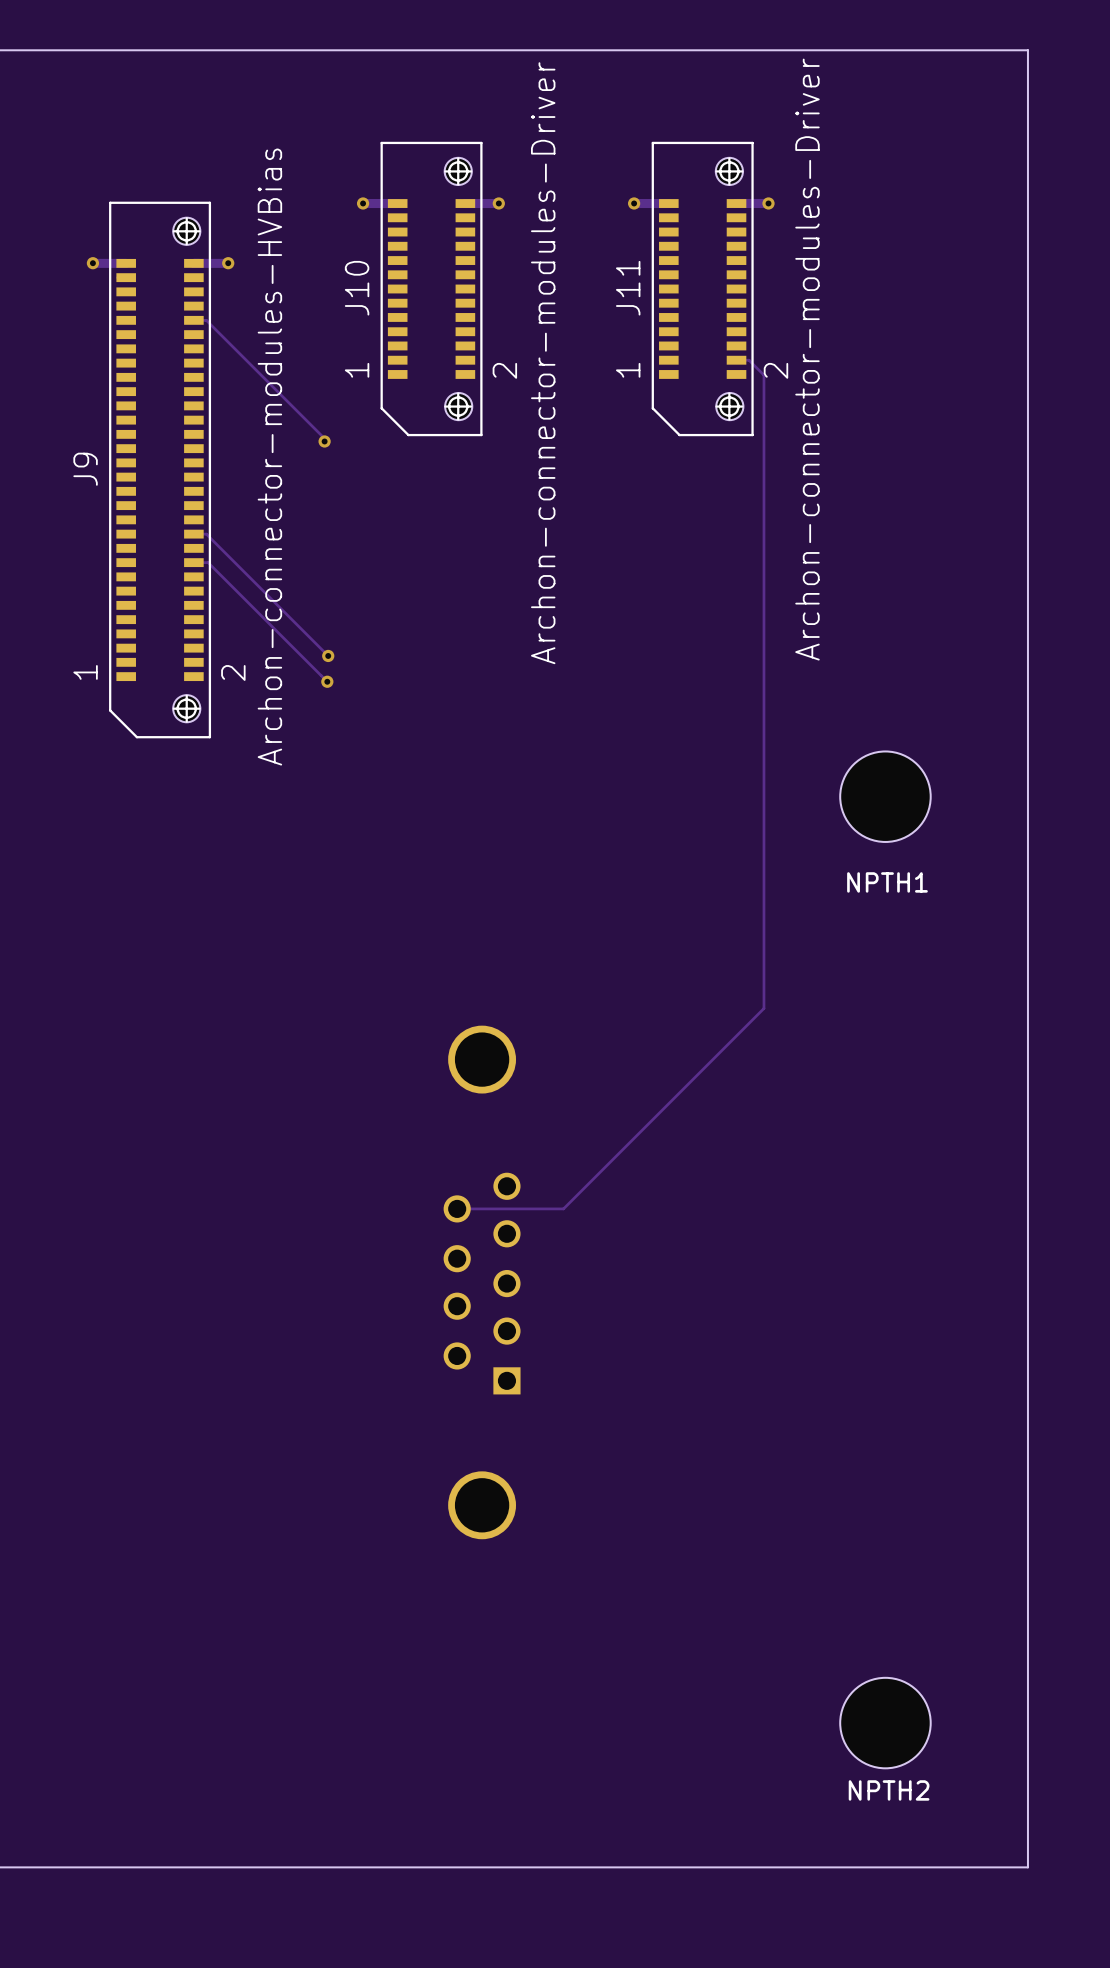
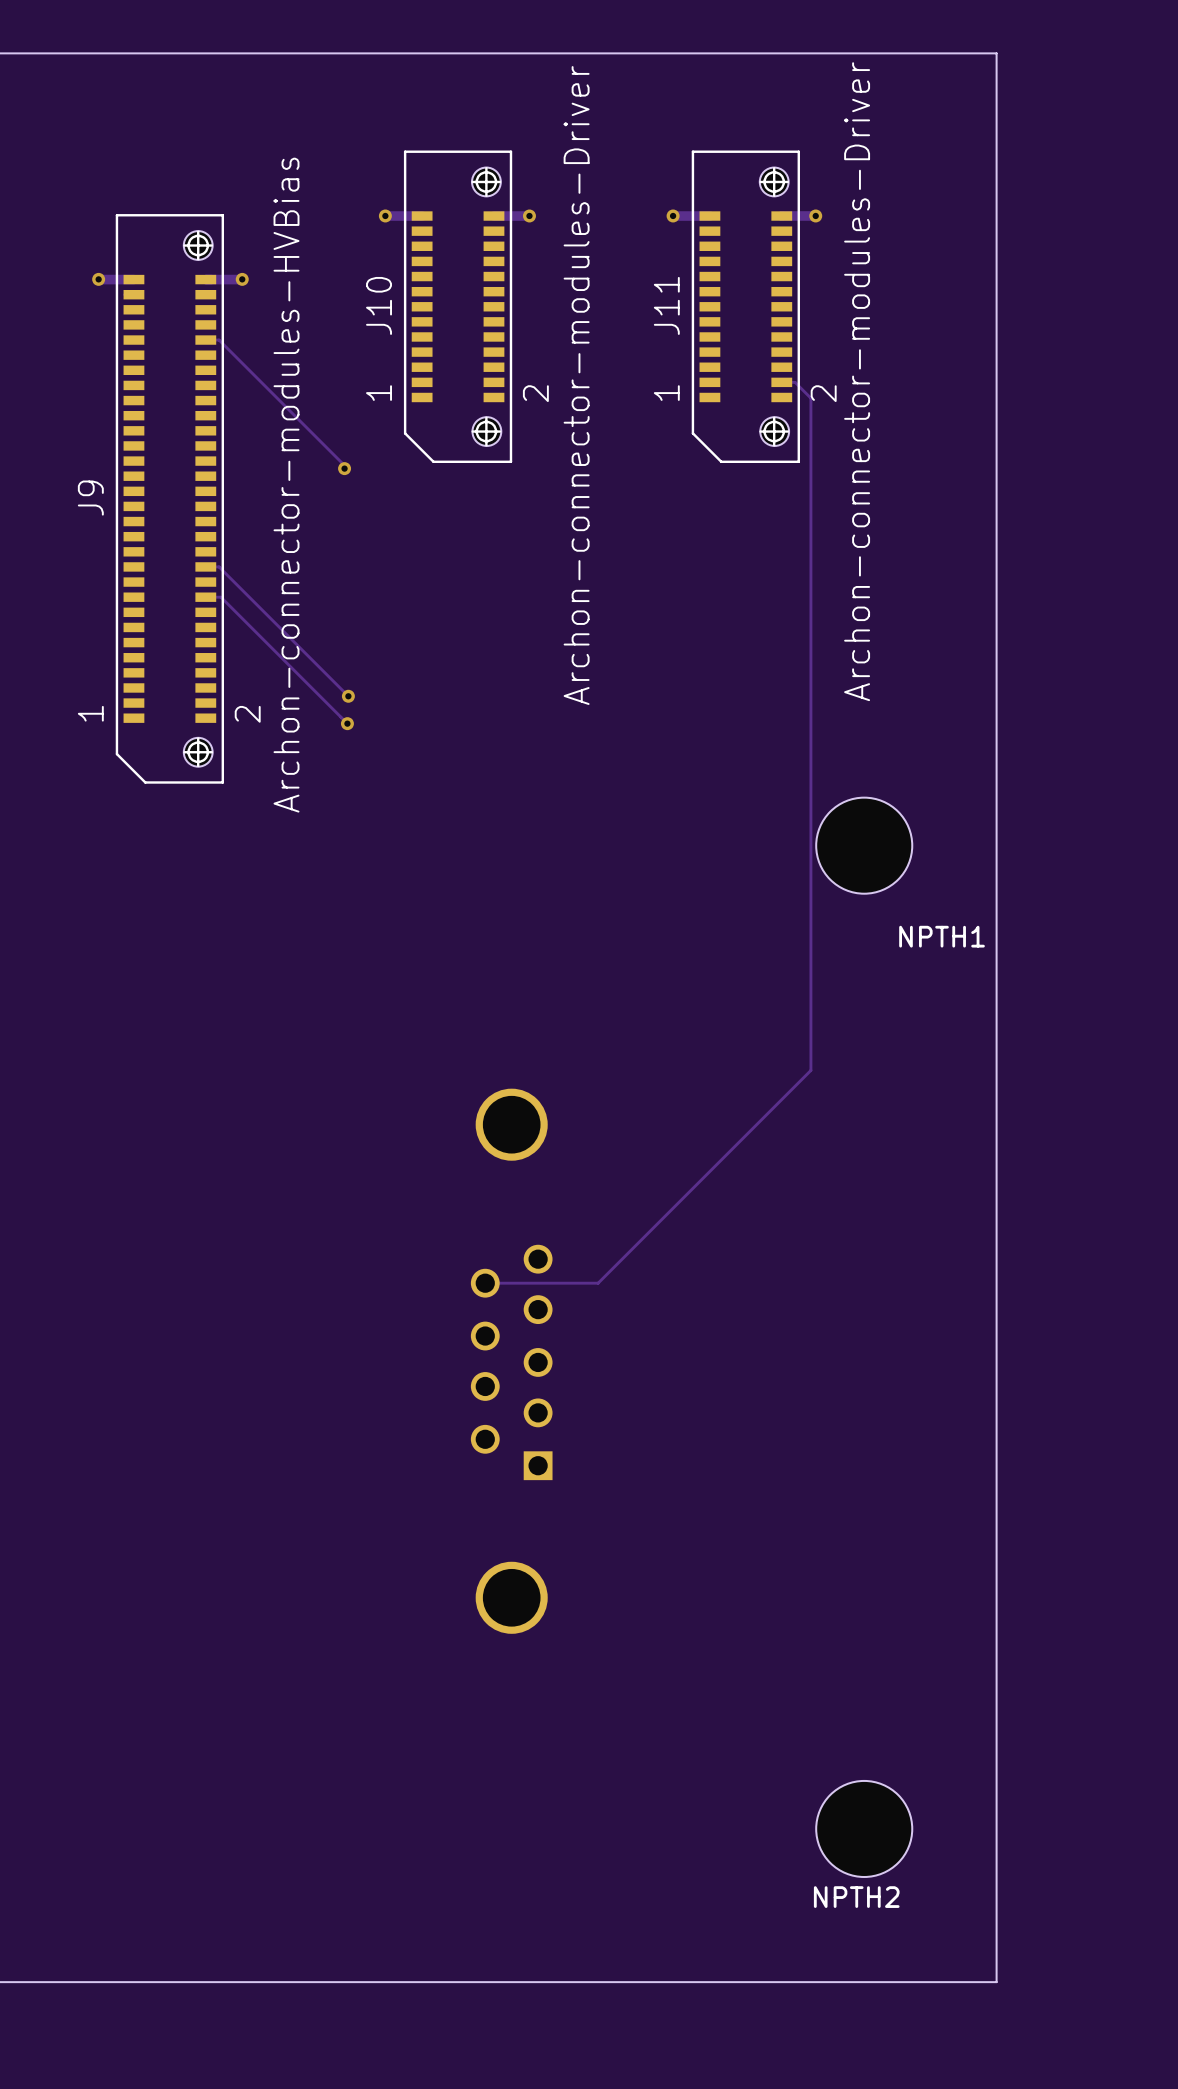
board edge: (938, 50) (1027, 50) (1027, 1867) (938, 1867) -> (996, 53) (996, 1982)
NPTH1 position: (885, 796) -> (864, 845)
NPTH2 position: (885, 1723) -> (864, 1828)
NPTH2 name position: NPTH2 (889, 1790) -> NPTH2 (856, 1897)

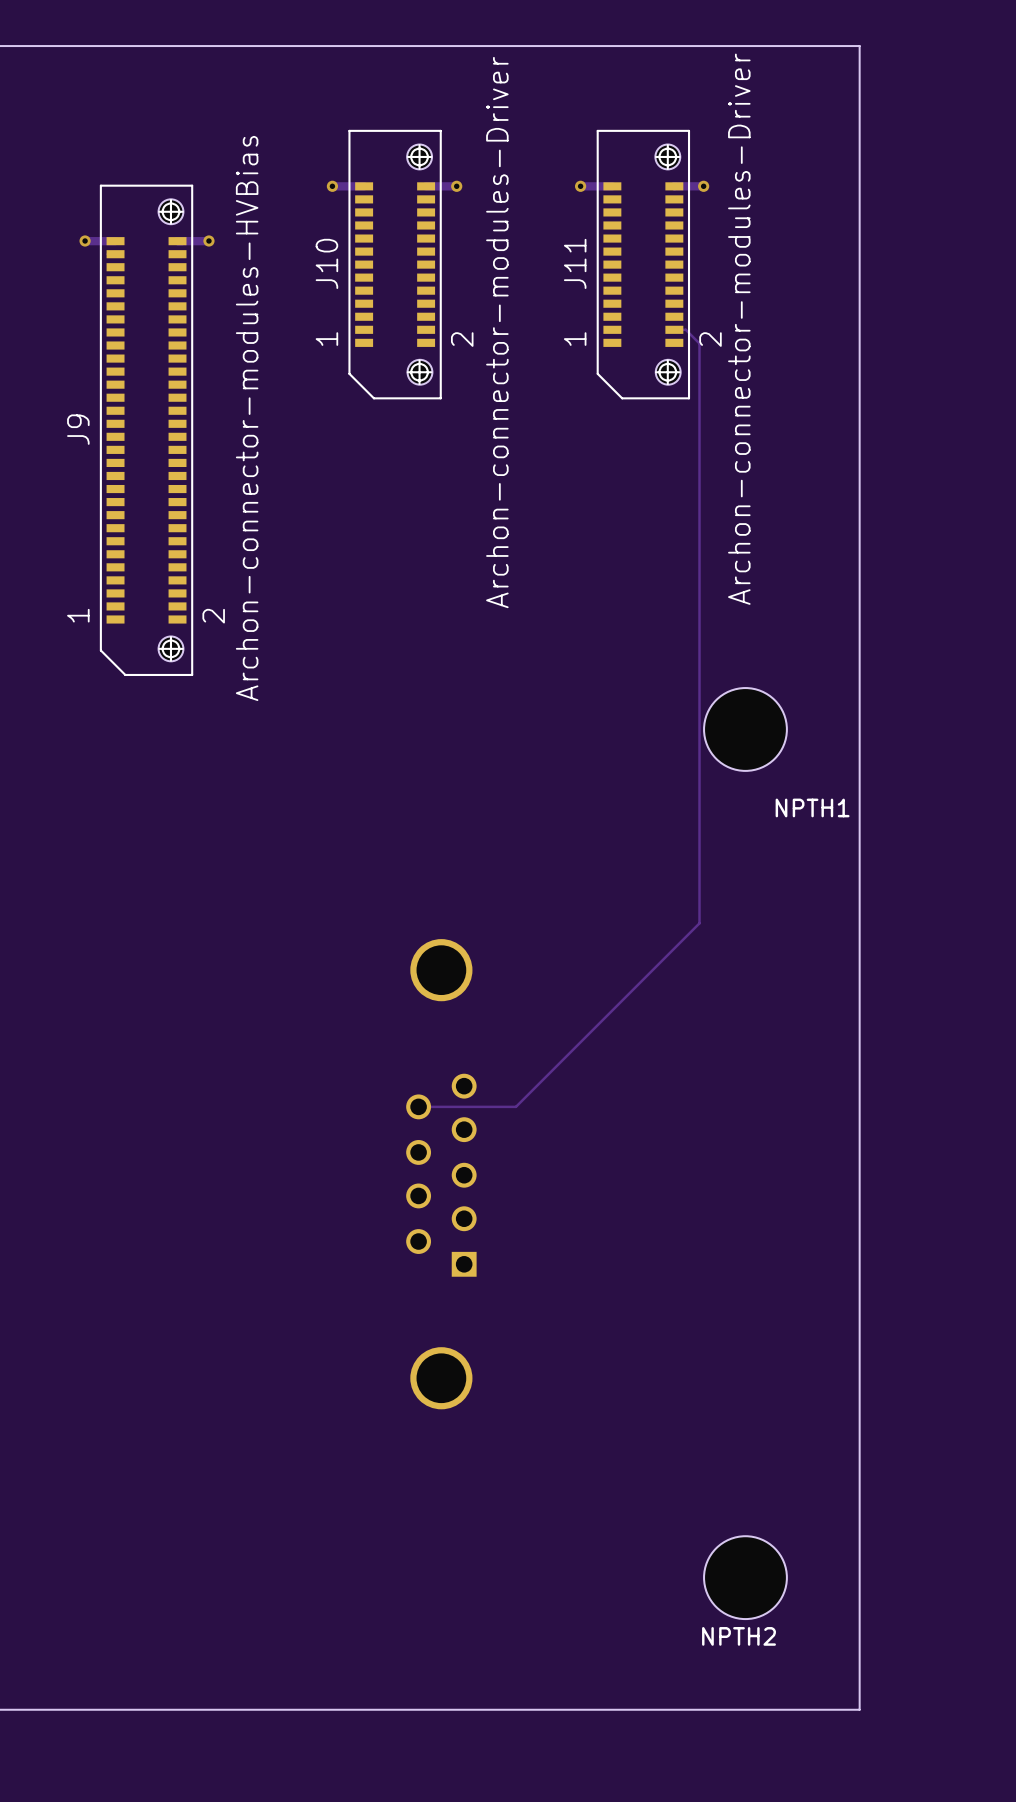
track: (205, 340) (219, 340) (344, 465) (344, 468) -> none
via: (344, 468) -> none
track: (205, 566) (219, 566) (348, 696) -> none
track: (205, 597) (220, 597) (347, 723) -> none
via: (348, 696) -> none
via: (347, 723) -> none

